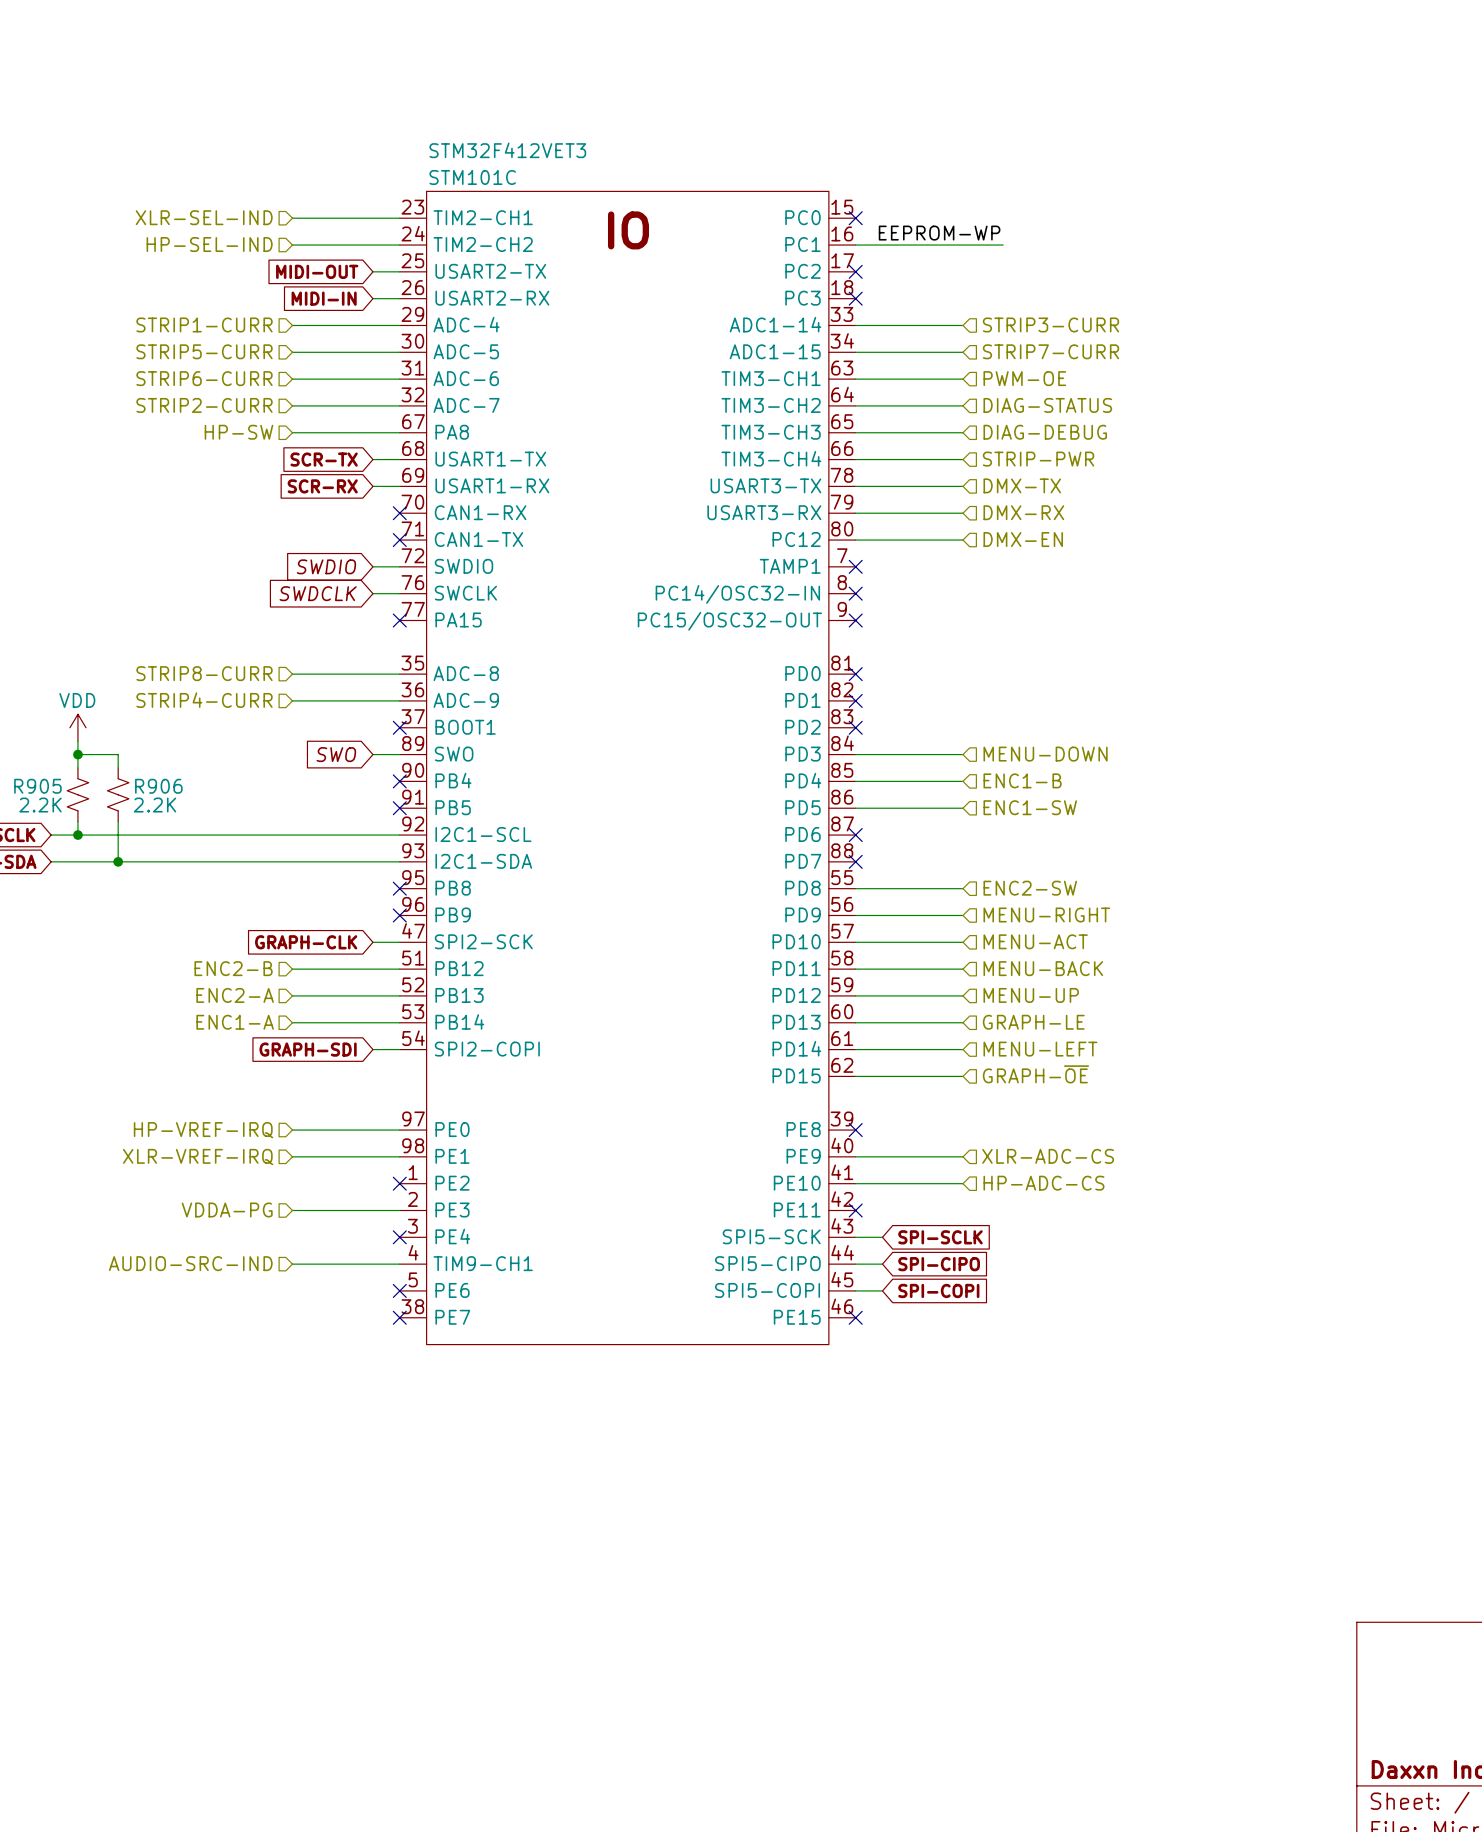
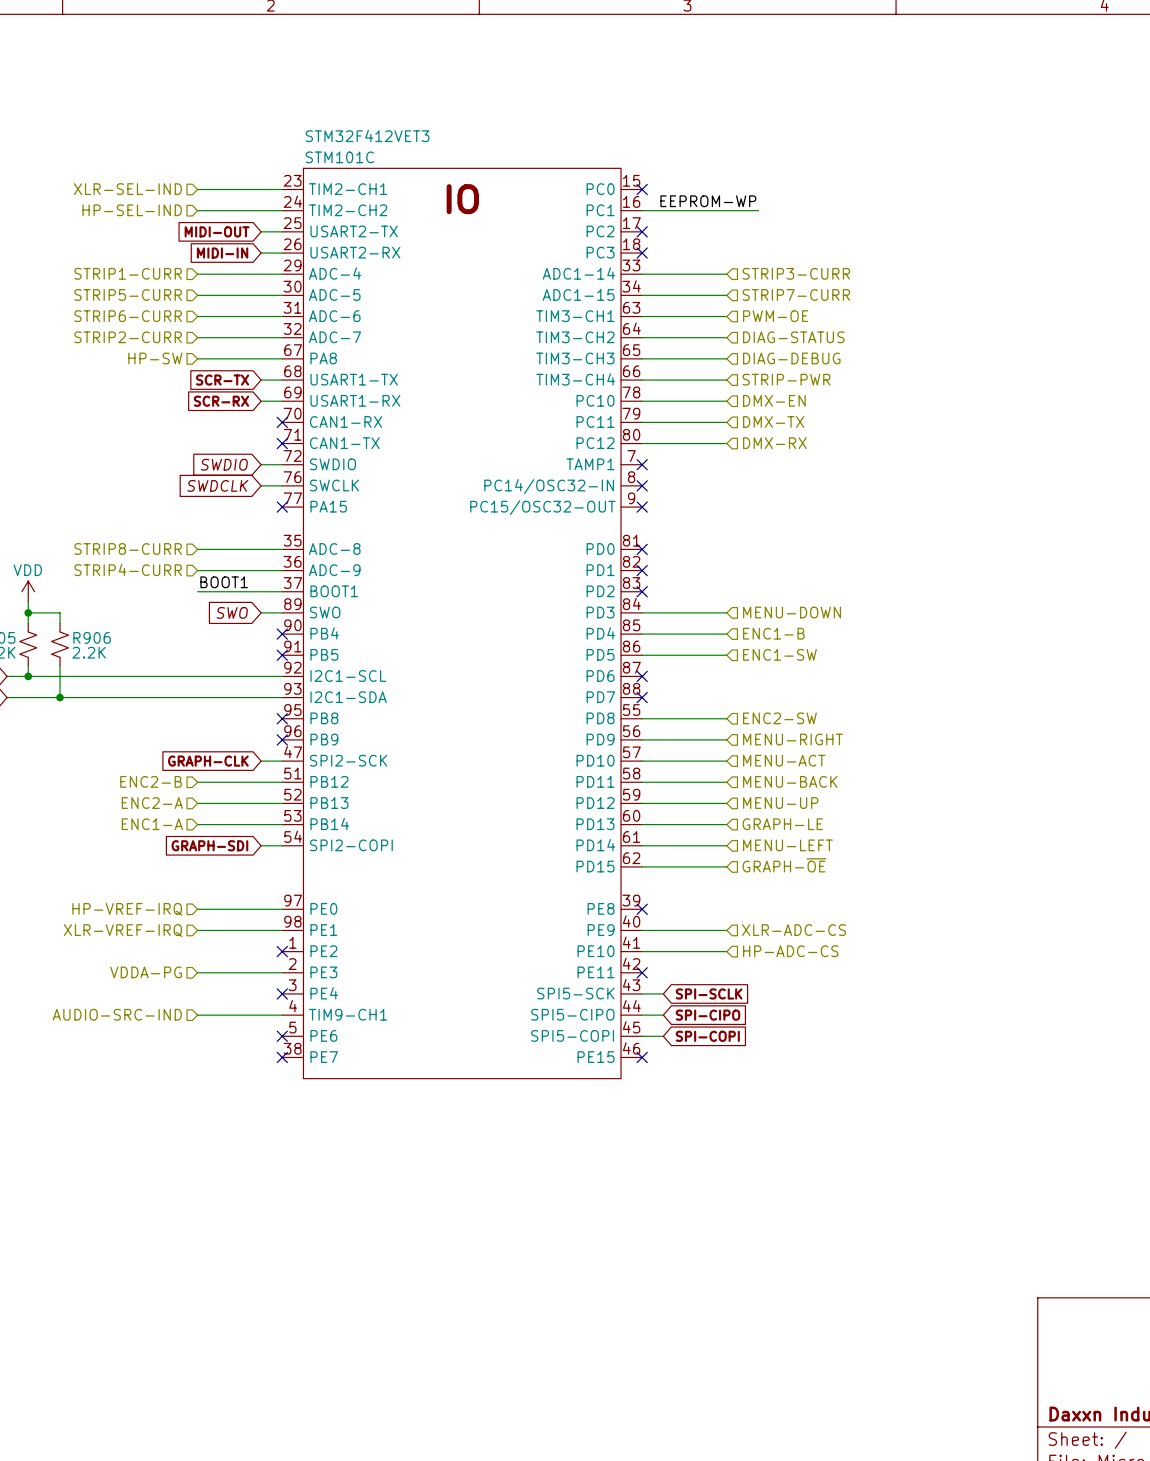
STM101C pin name: USART3-TX (765, 485) -> PC10 (595, 400)
hierarchical label: DMX-TX (1022, 485) -> DMX-EN (774, 400)
STM101C pin name: USART3-RX (764, 512) -> PC11 (595, 421)
hierarchical label: DMX-RX (1023, 512) -> DMX-TX (773, 421)
hierarchical label: DMX-EN (1023, 539) -> DMX-RX (774, 443)
label: none -> BOOT1 (224, 582)
wire: none -> (197, 591) (282, 591)
no-connect mark: (399, 727) -> none

